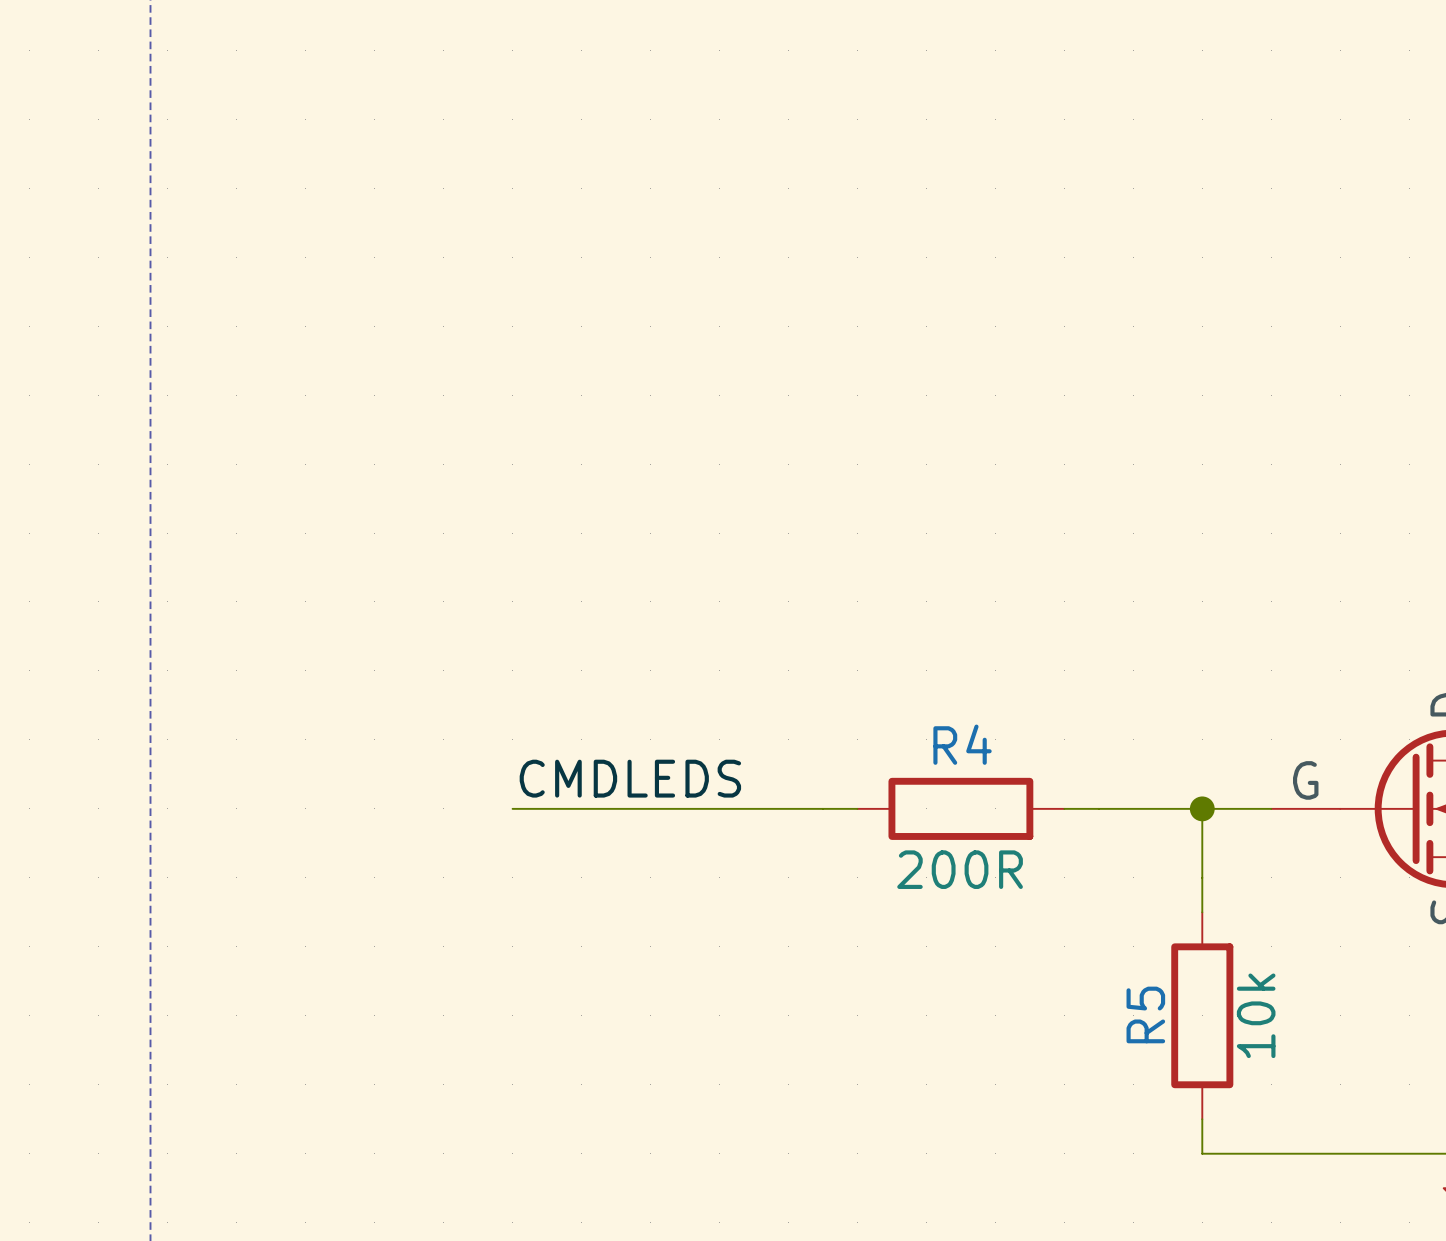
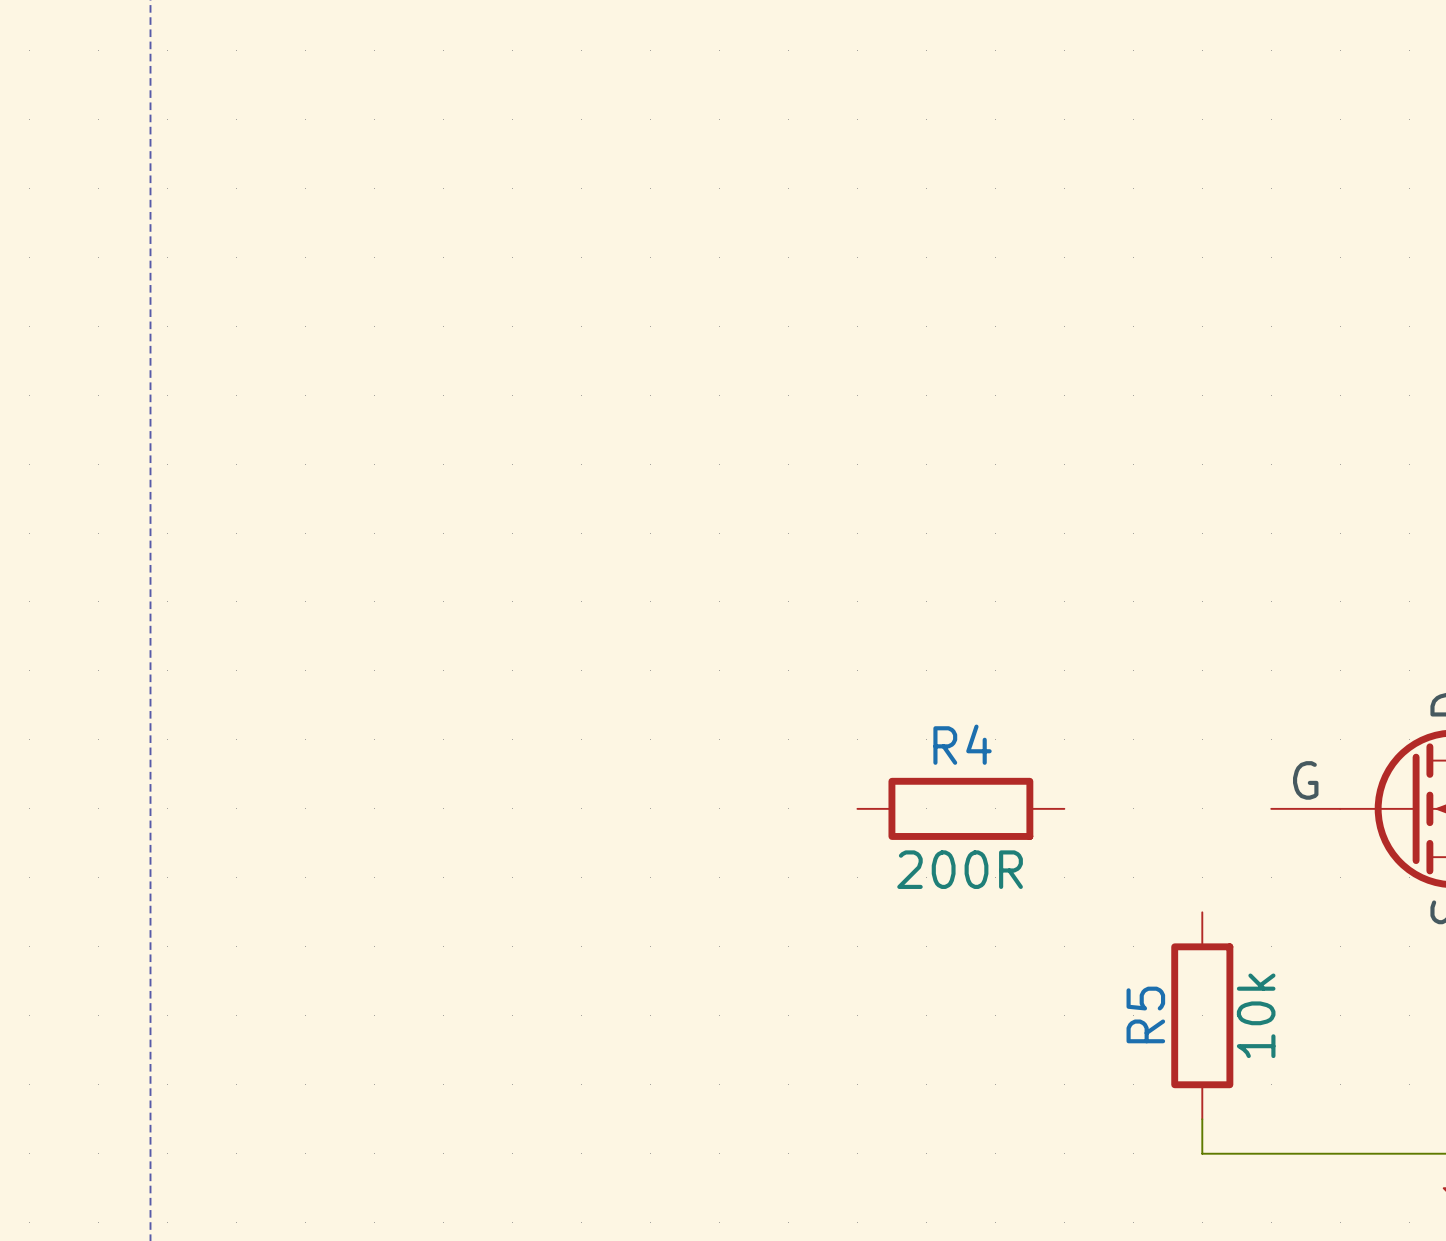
label: CMDLEDS (630, 778) -> none
wire: (512, 808) (857, 808) -> none
wire: (1064, 808) (1271, 808) -> none
wire: (1202, 808) (1202, 912) -> none
junction: (1202, 808) -> none

